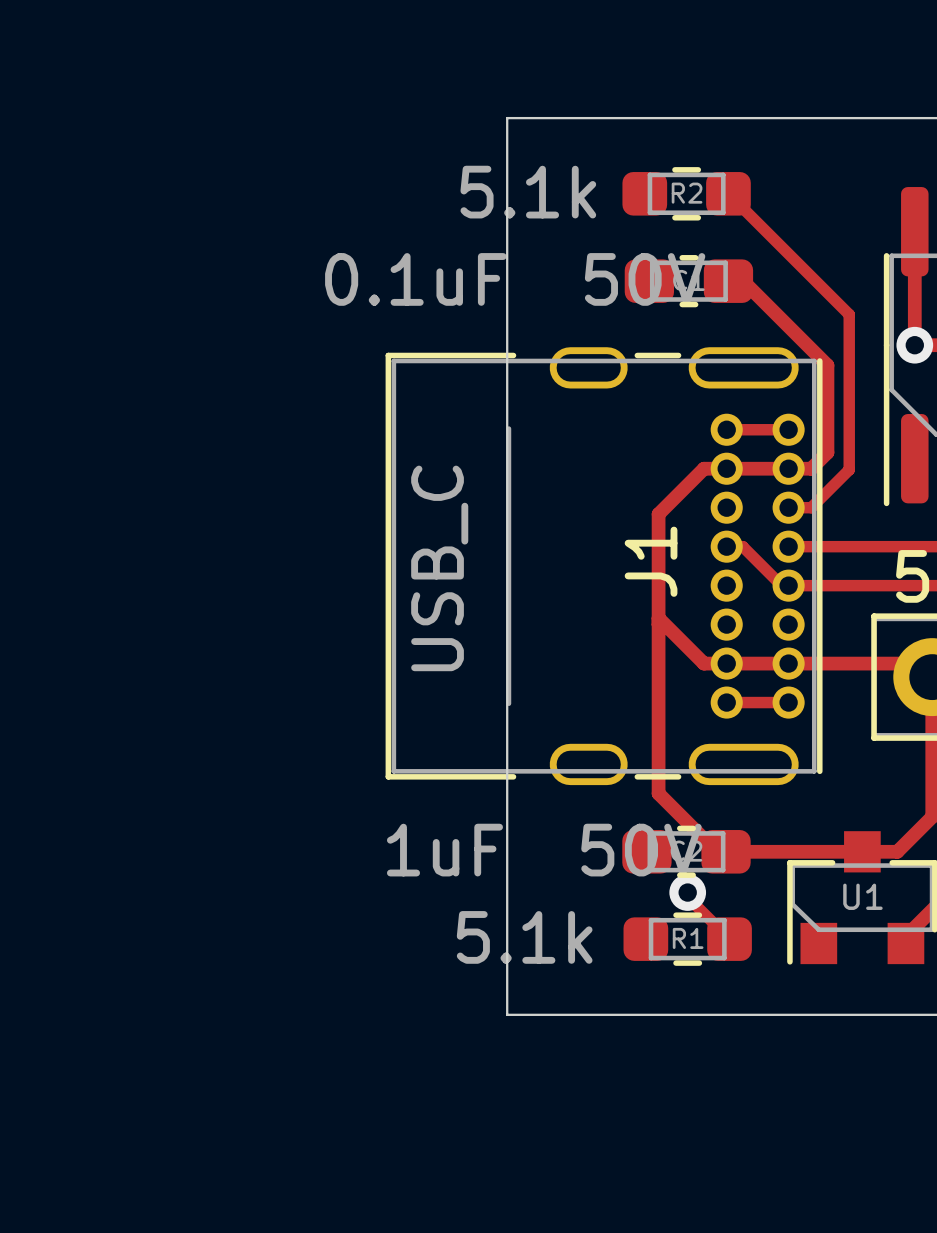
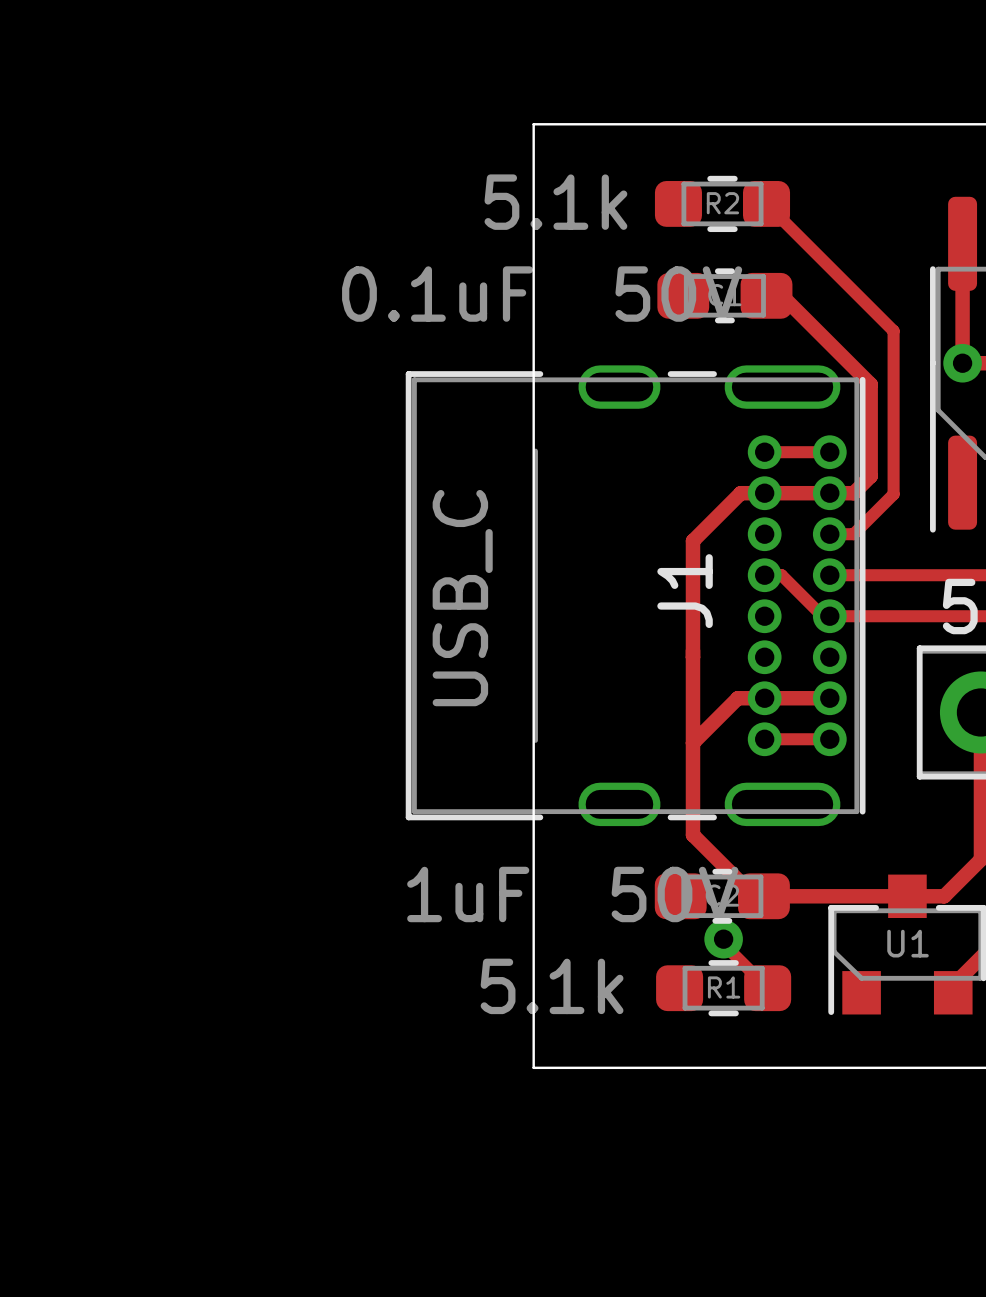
track: (658, 618) (704, 663) -> (692, 743) (737, 698) (740, 698)
track: (788, 663) (918, 663) -> none

